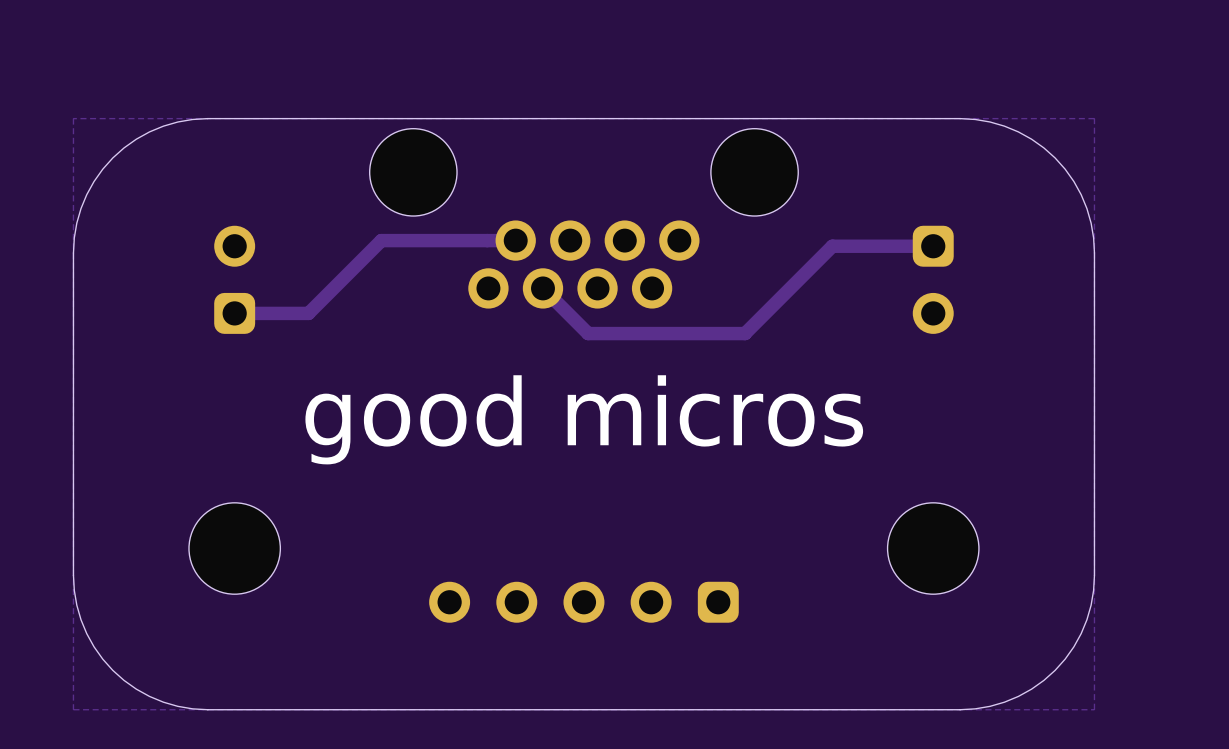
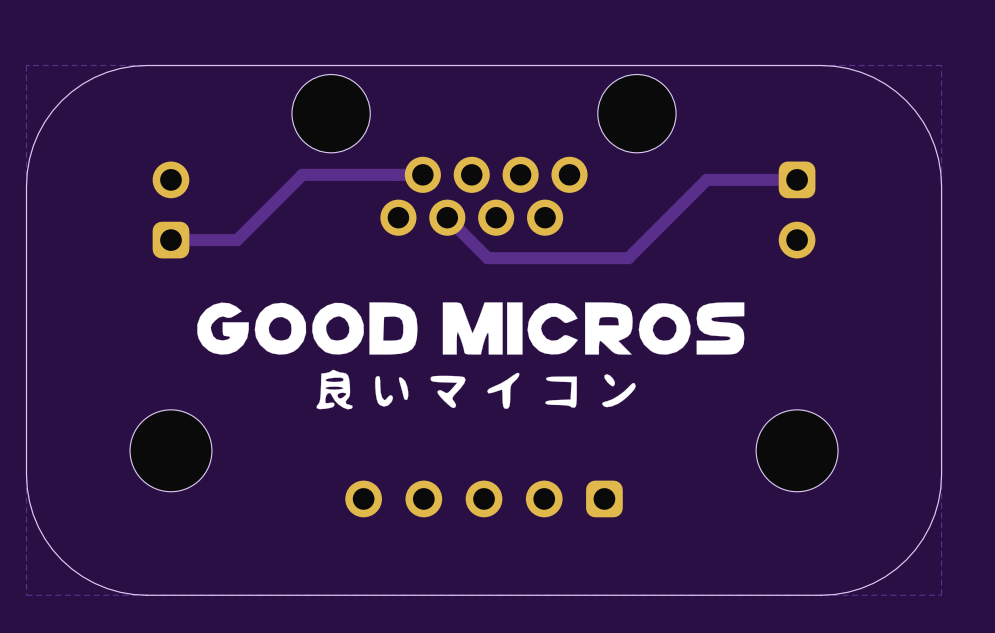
drawing: none -> [197, 302, 745, 410]
text: good micros (584, 419) -> none

